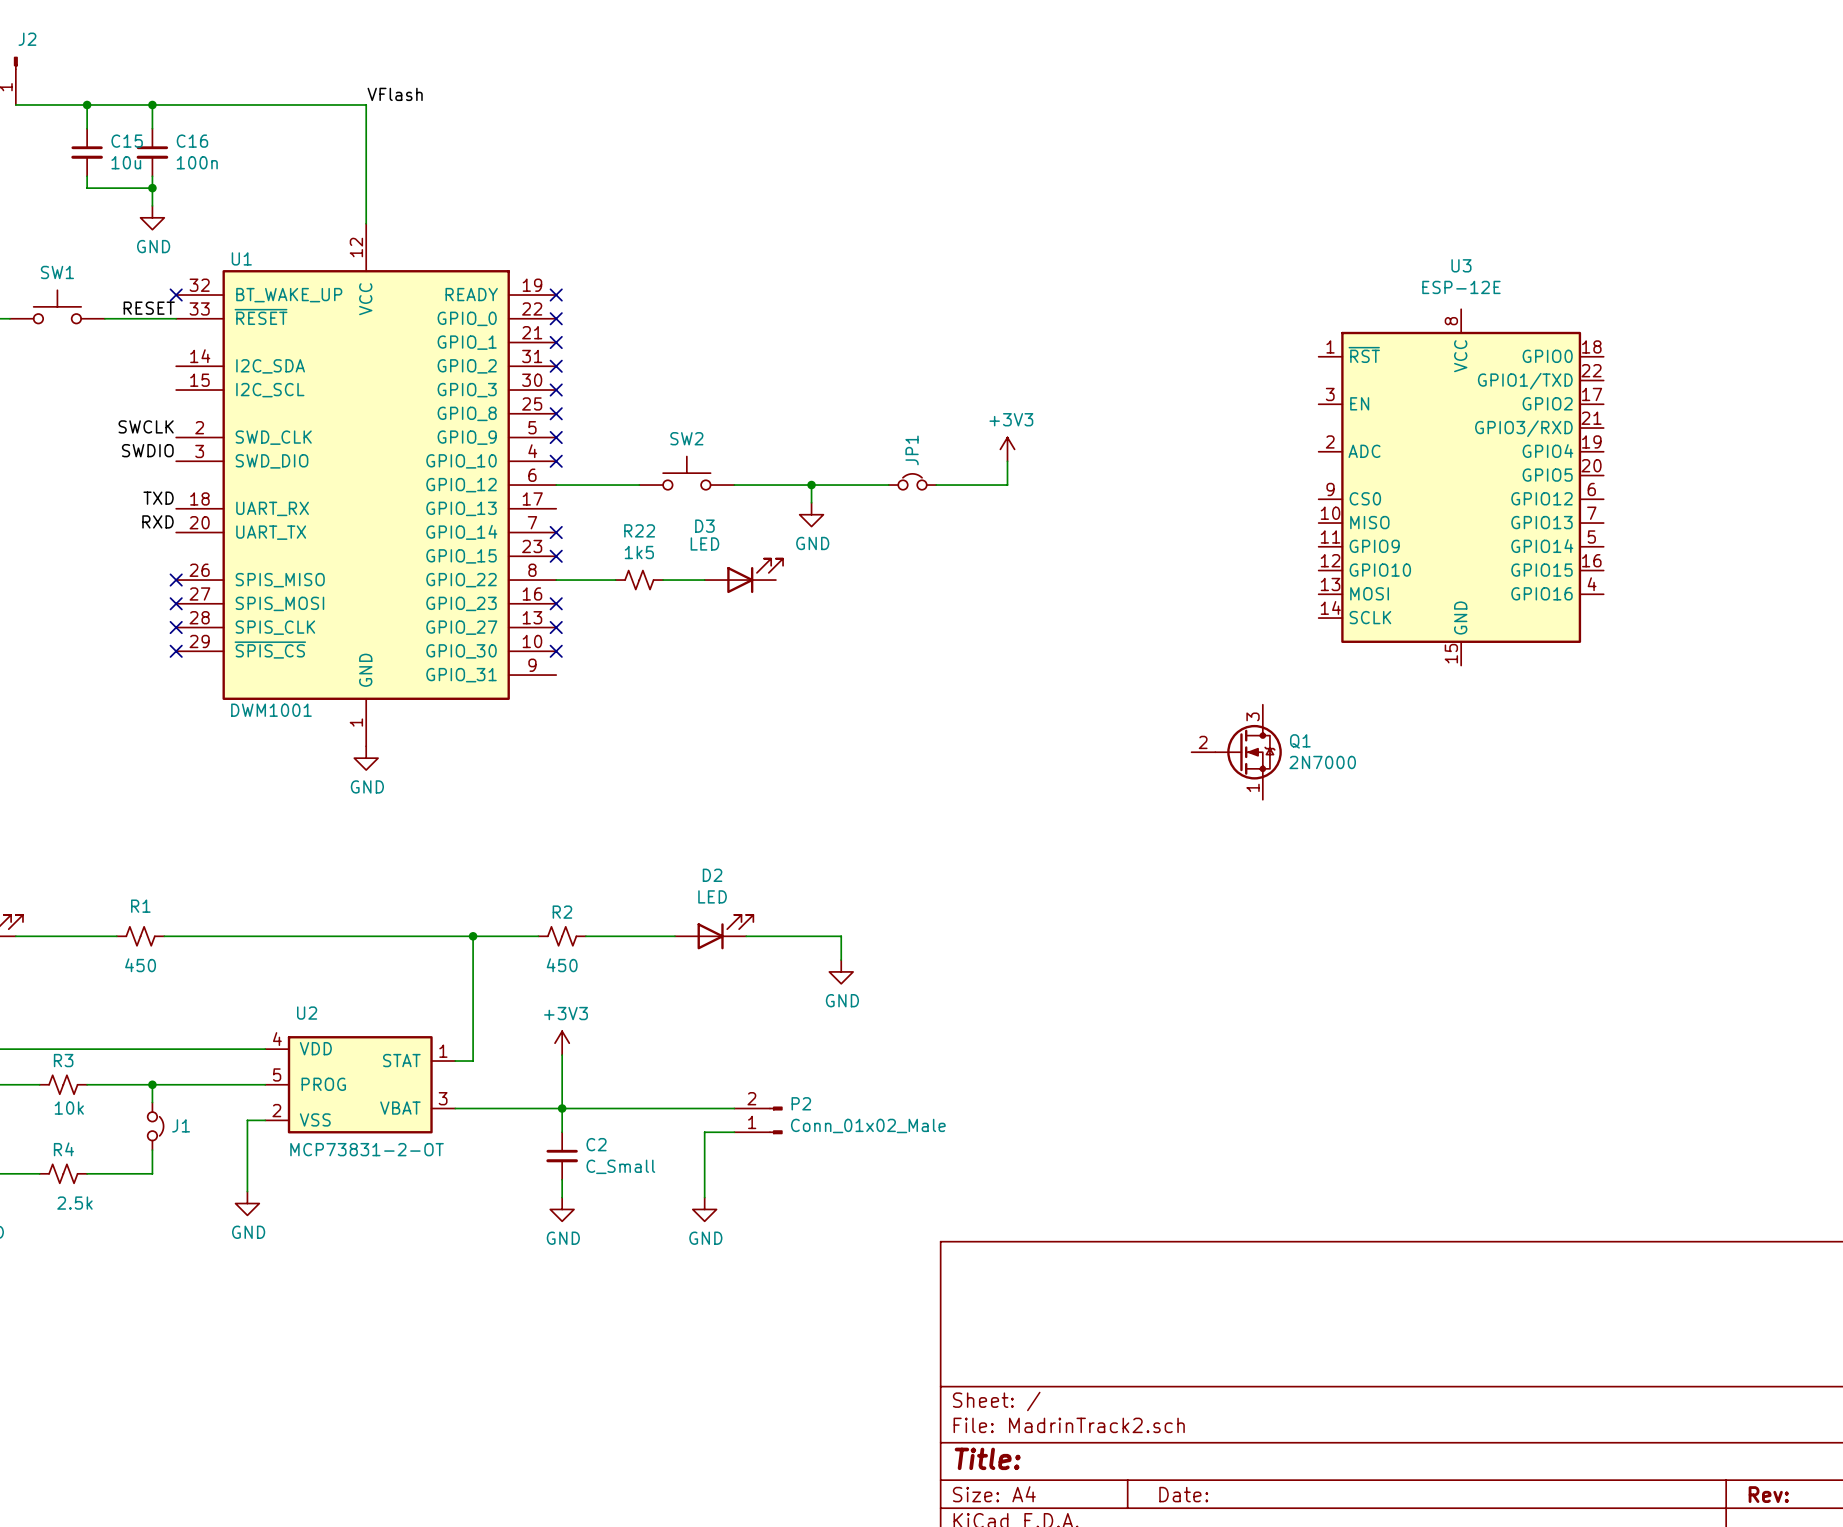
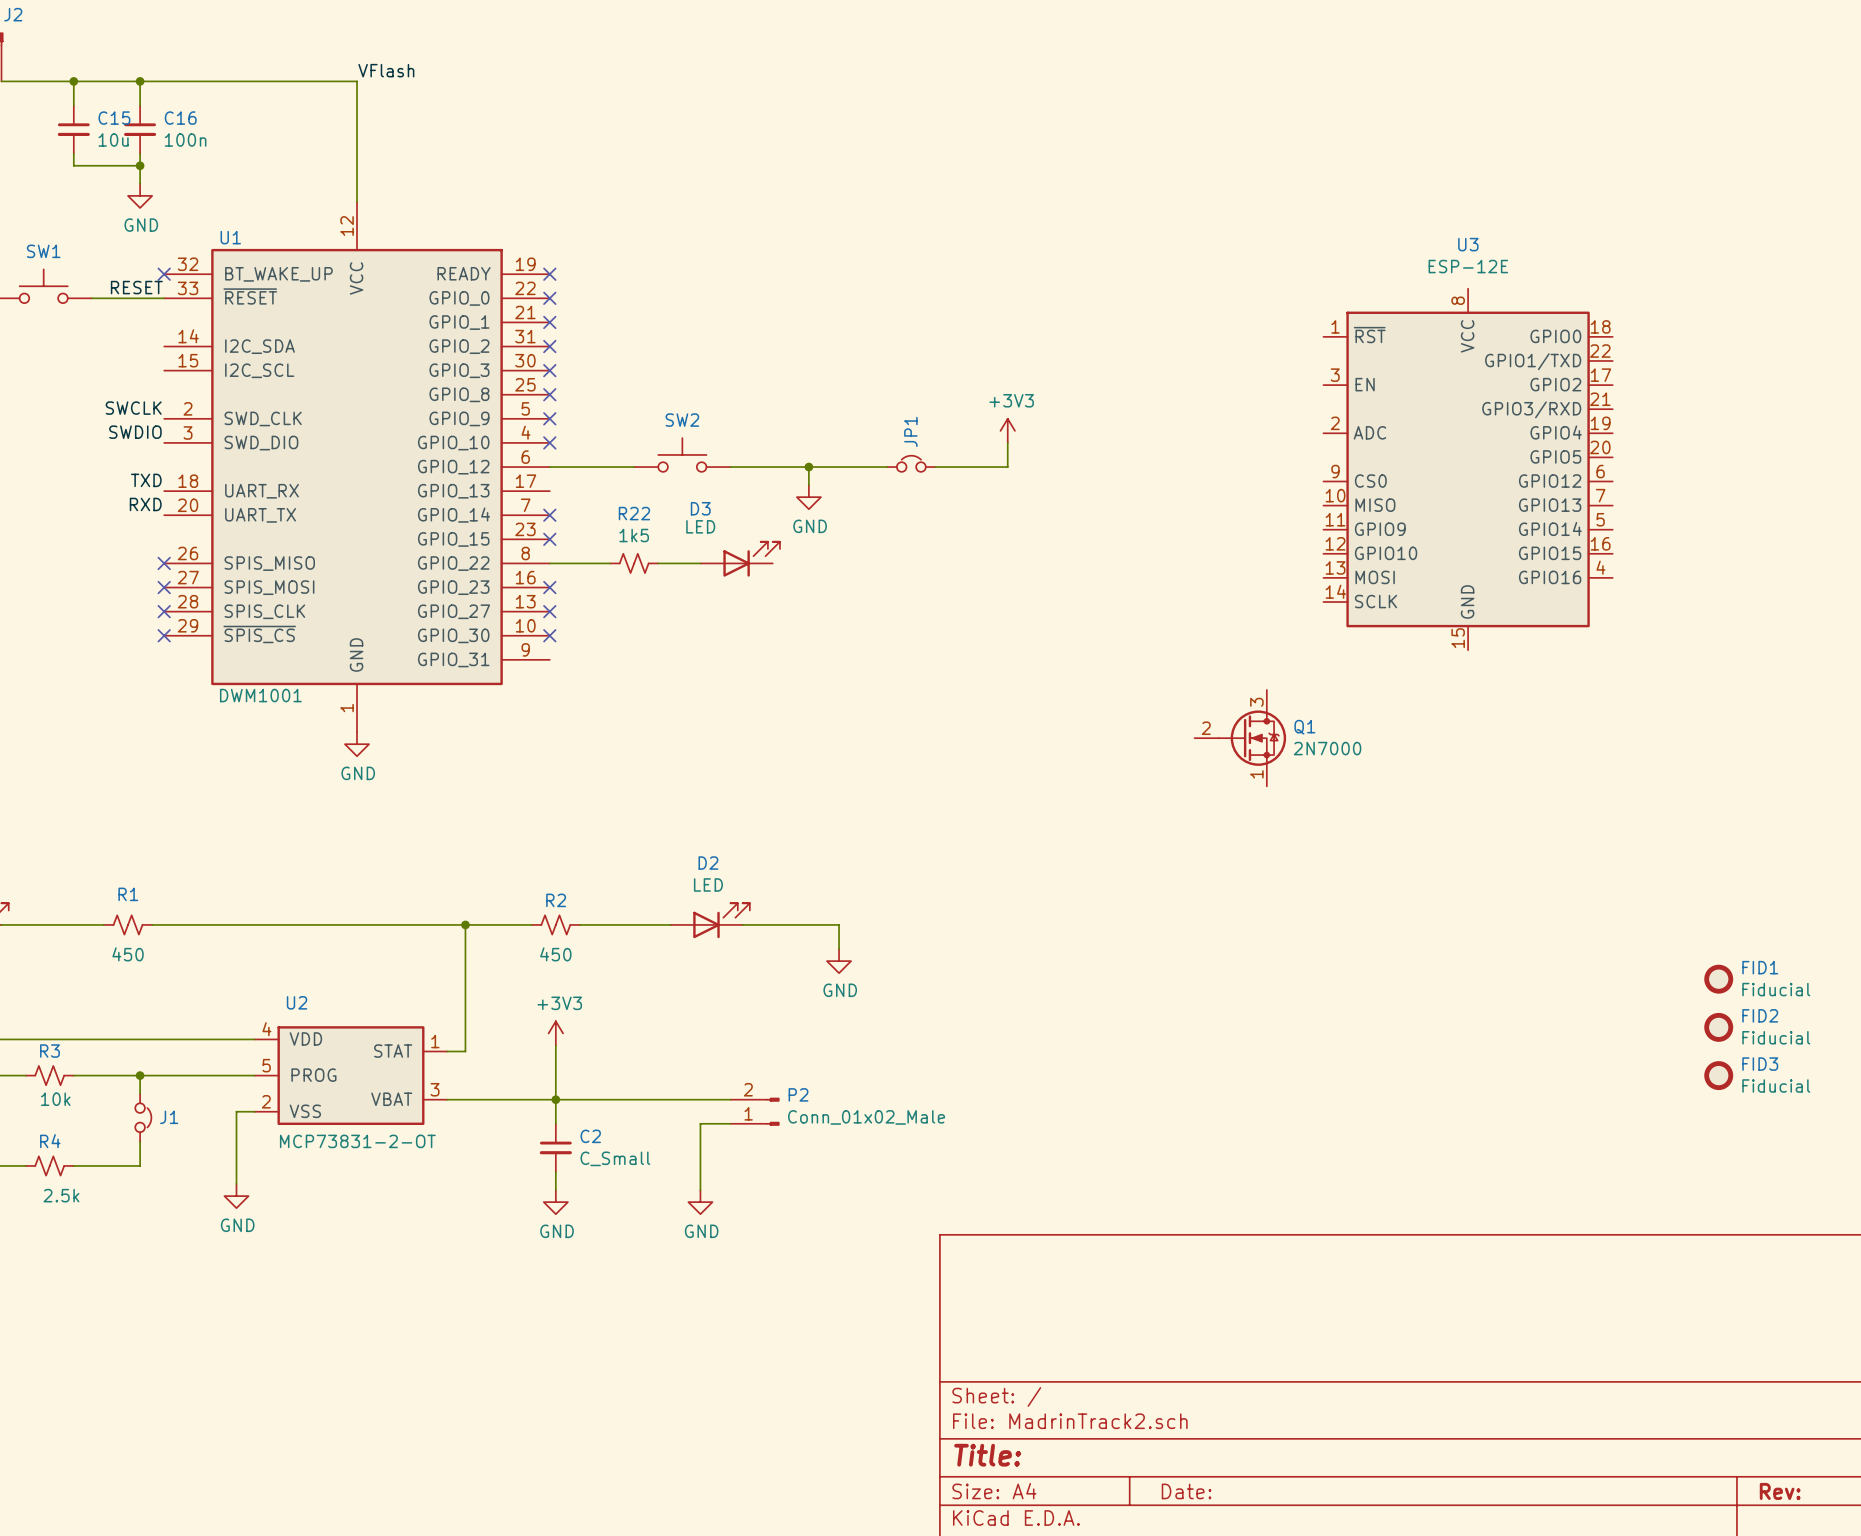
FID1: none -> Fiducial (1718, 979)
FID2: none -> Fiducial (1718, 1027)
FID3: none -> Fiducial (1718, 1075)

